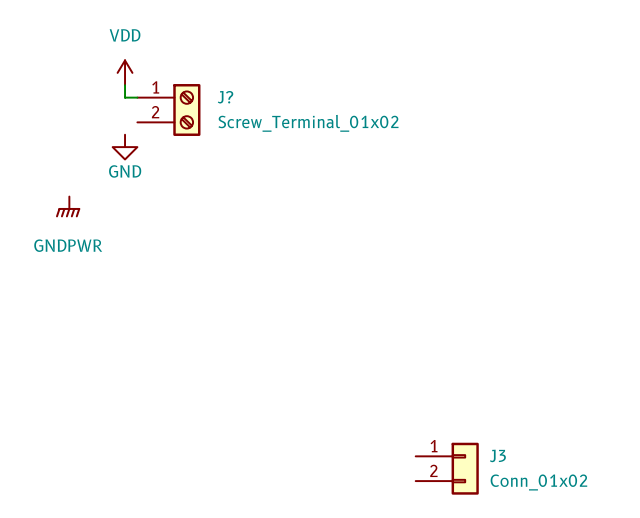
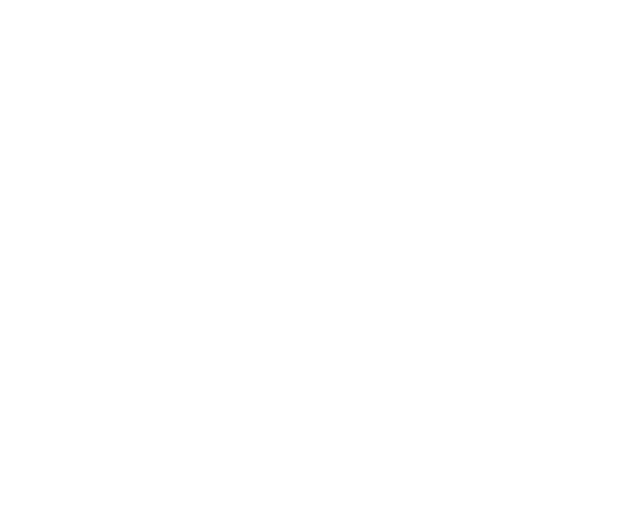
power symbol: VDD (125, 72) -> none
wire: (125, 85) (125, 97) (137, 97) -> none
J?: Screw_Terminal_01x02 (168, 109) -> none
power symbol: GND (125, 147) -> none
power symbol: GNDPWR (68, 206) -> none
J3: Conn_01x02 (447, 468) -> none

